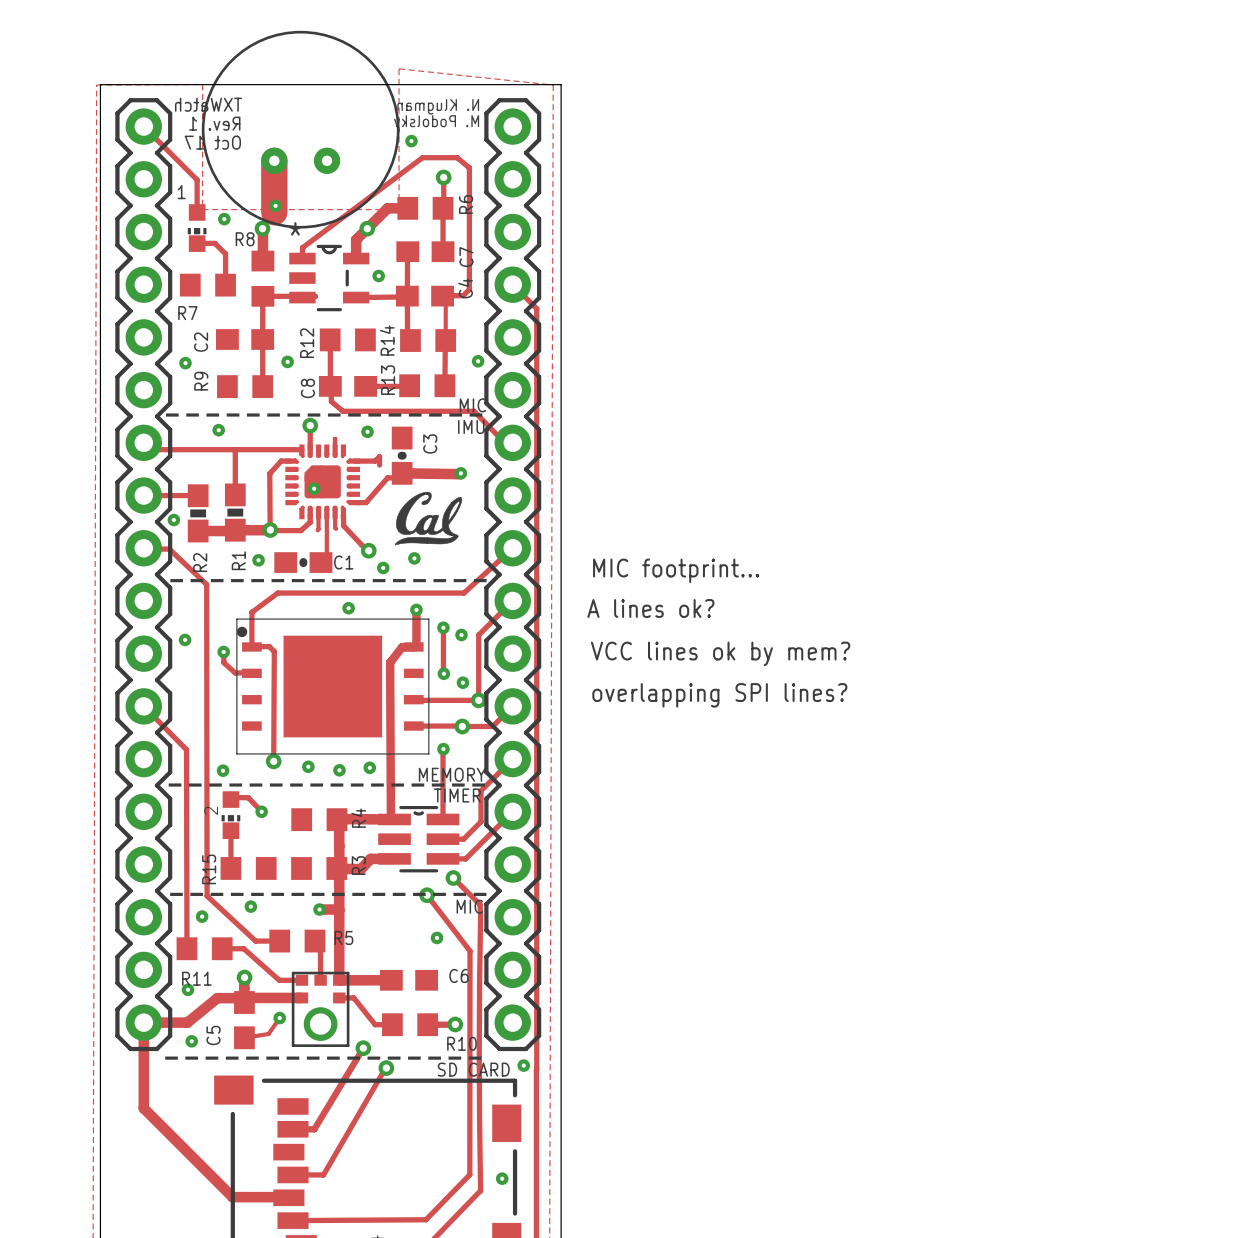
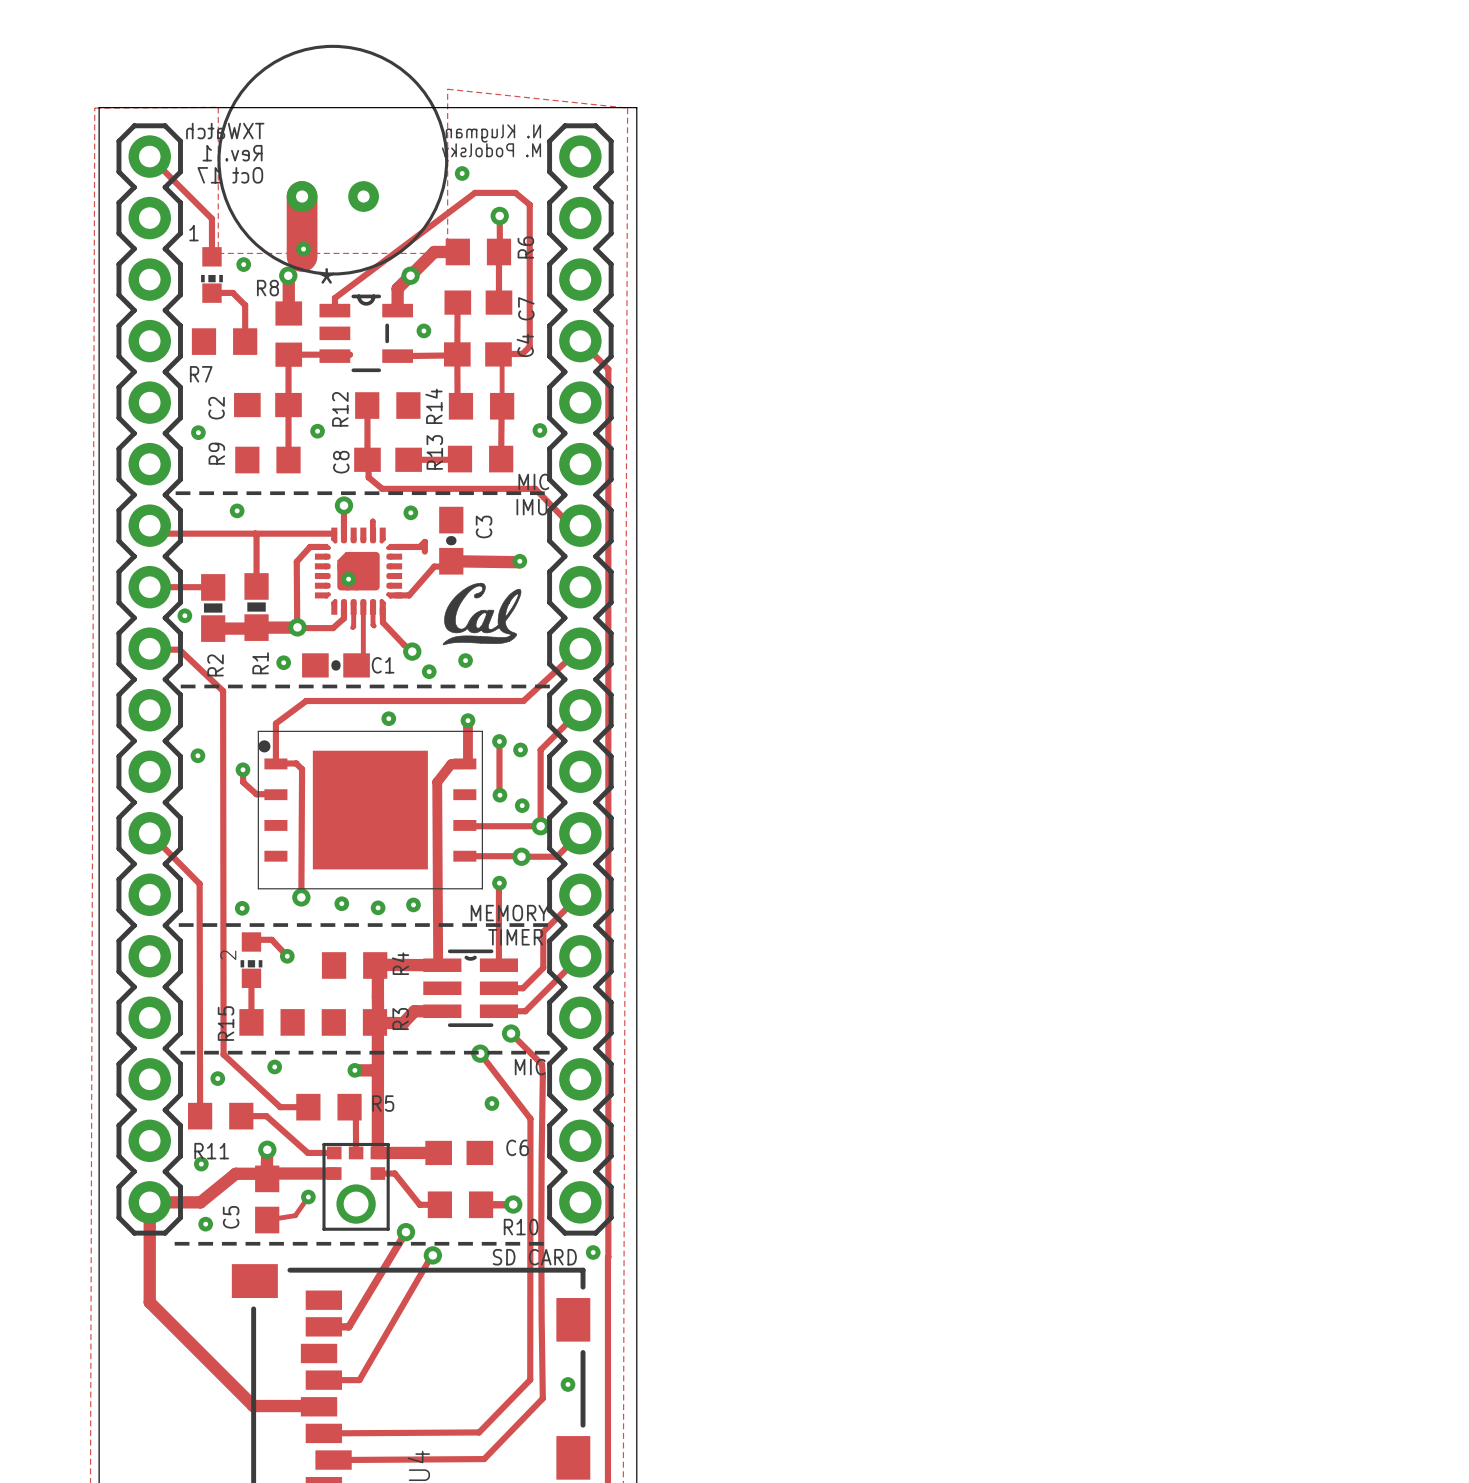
text: MIC footprint... (676, 570) -> none
text: A lines ok? (650, 608) -> none
text: VCC lines ok by mem? (720, 653) -> none
text: overlapping SPI lines? (719, 695) -> none

